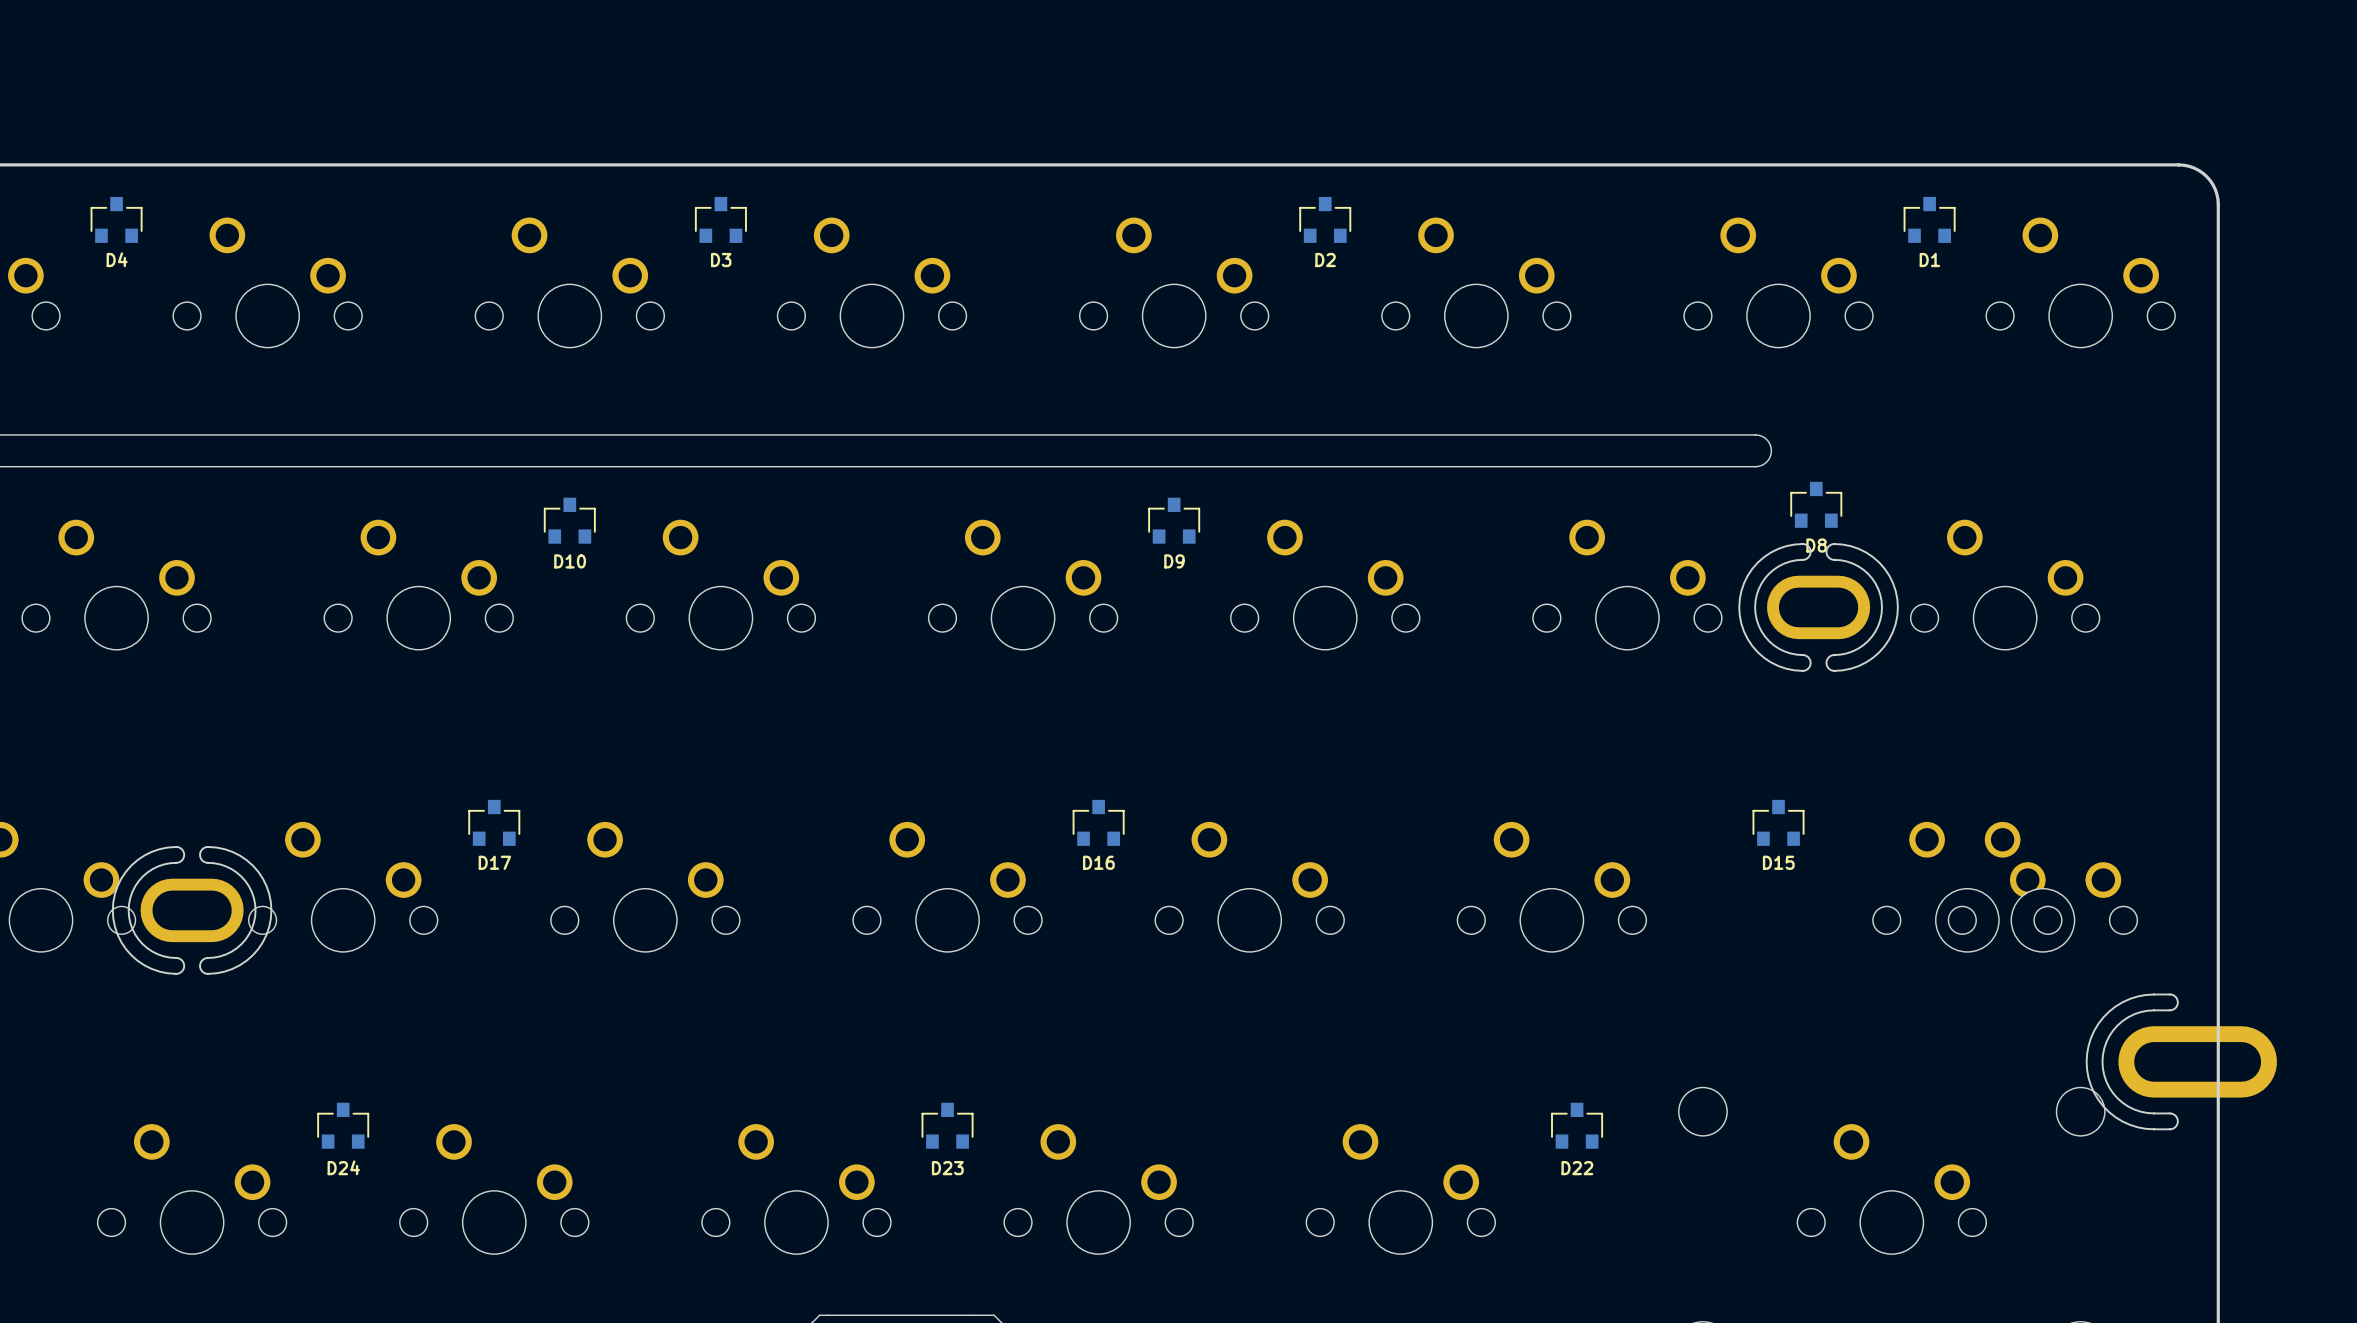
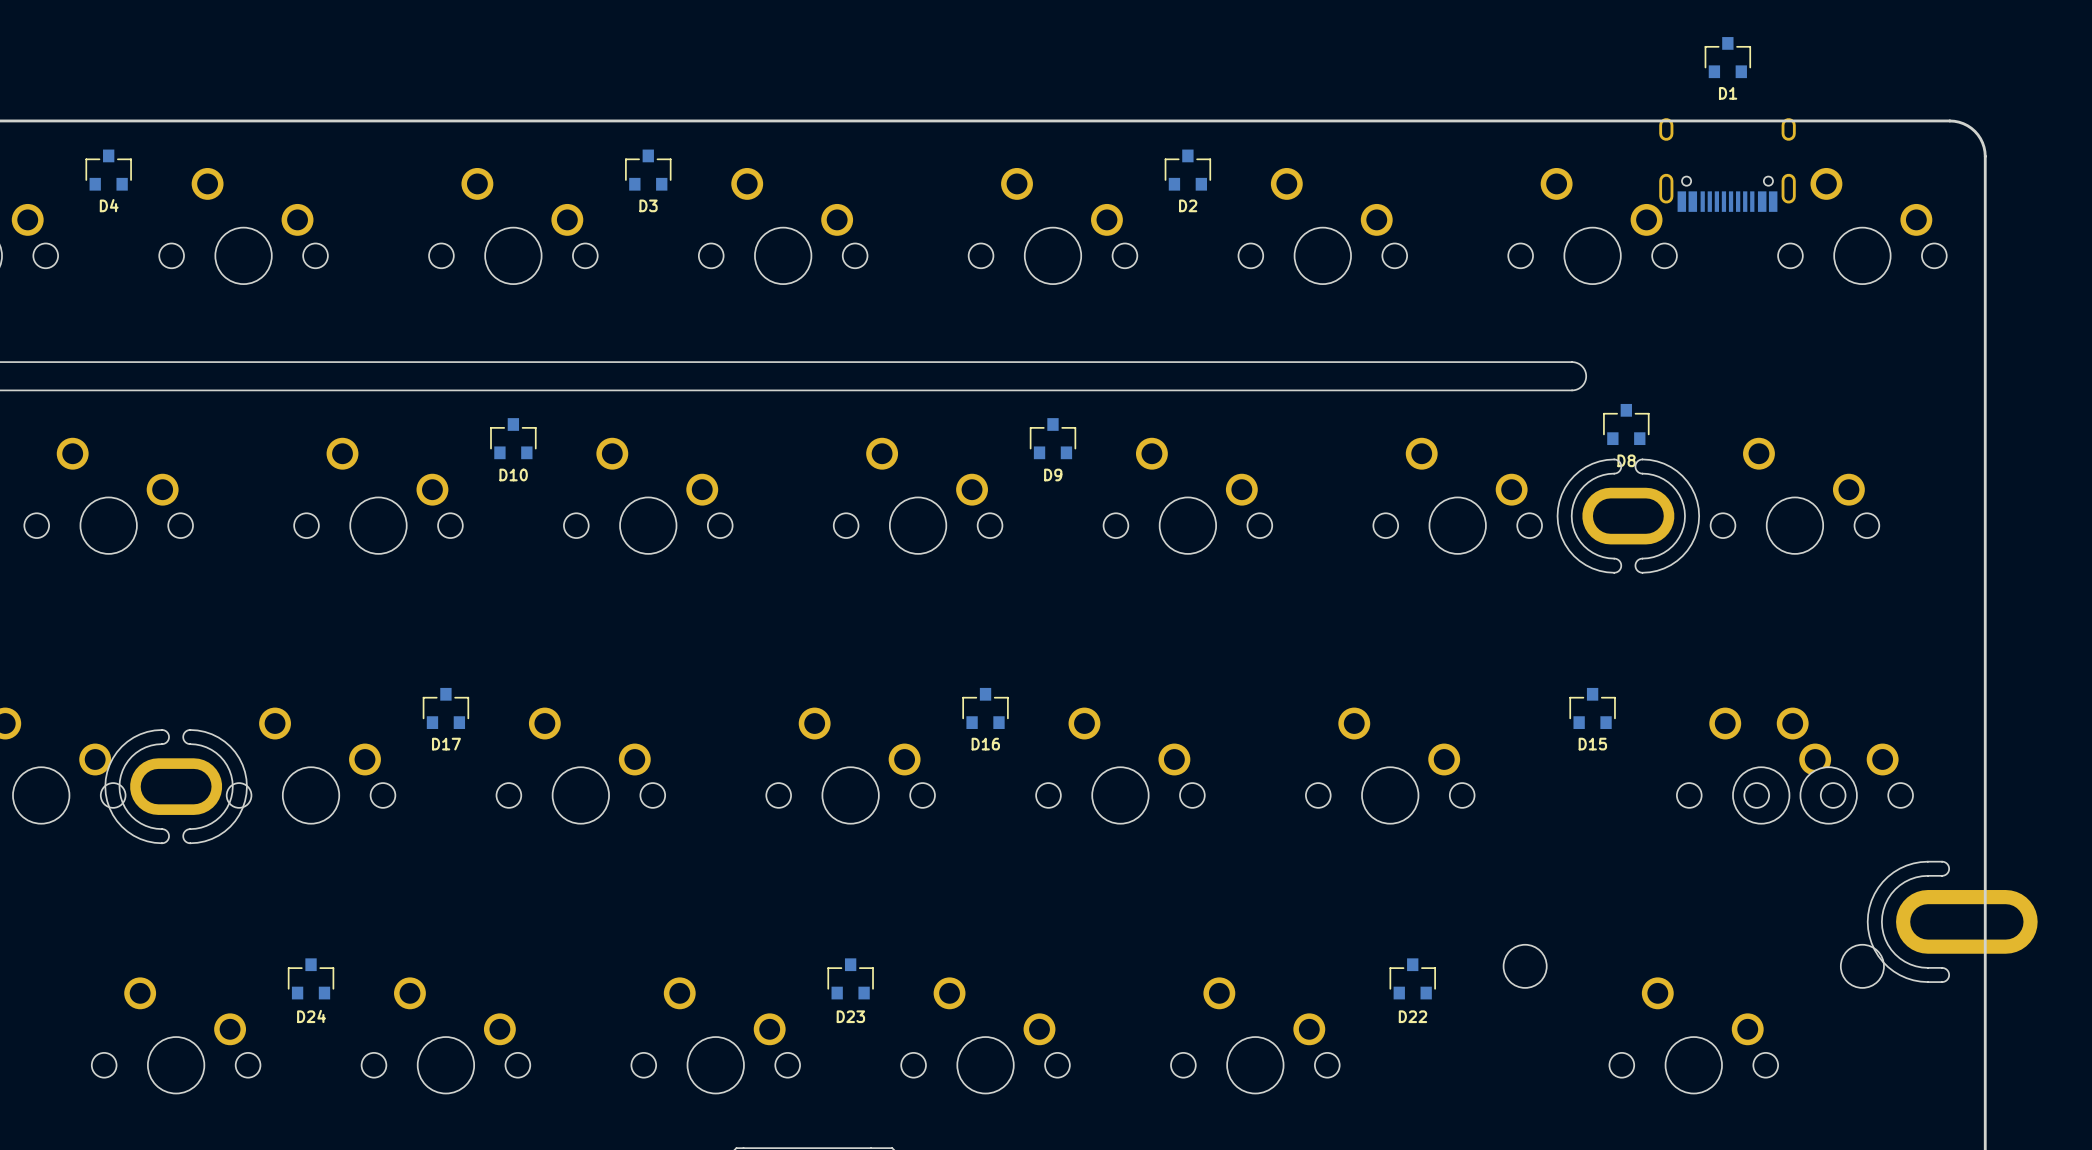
part: none -> (1727, 165)
D1 position: (1929, 219) -> (1727, 57)

